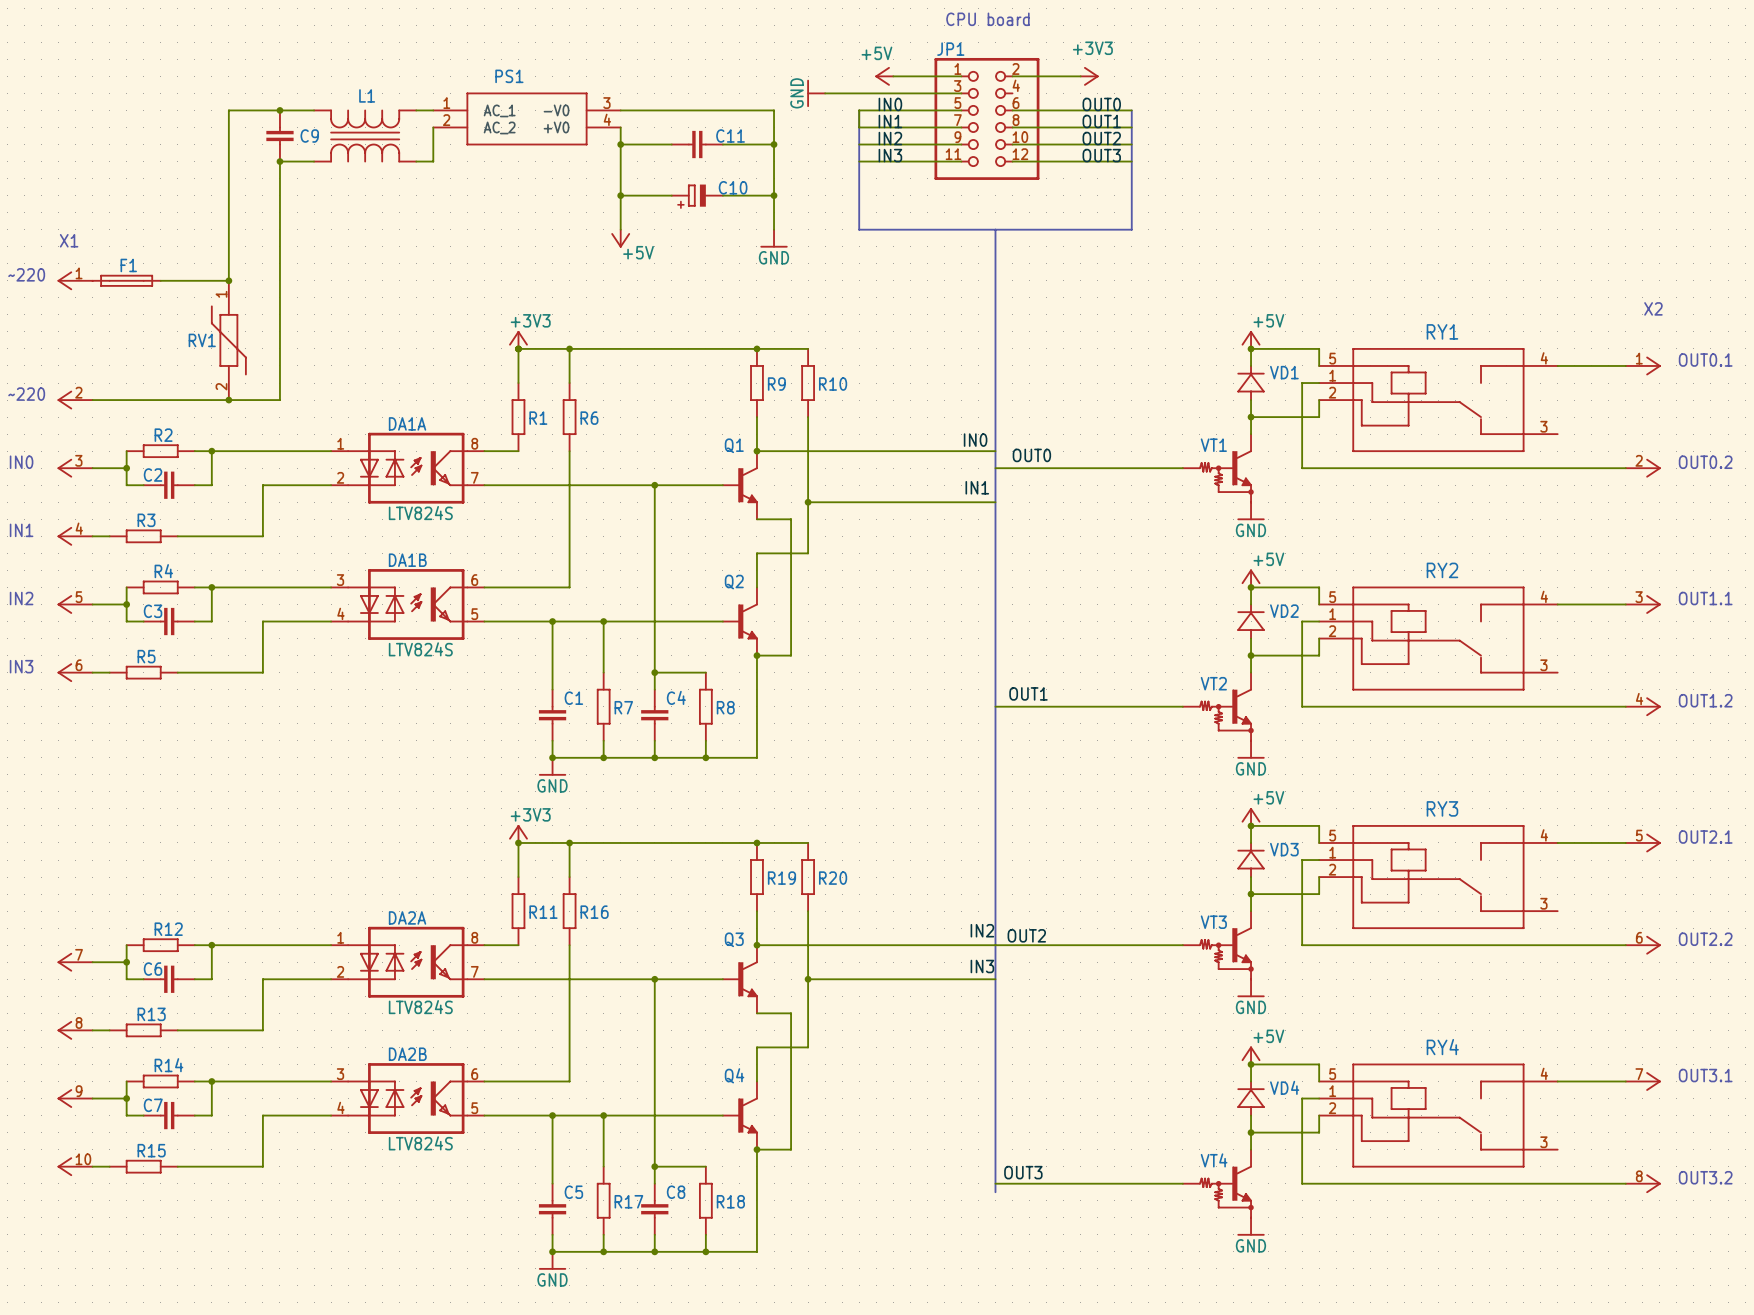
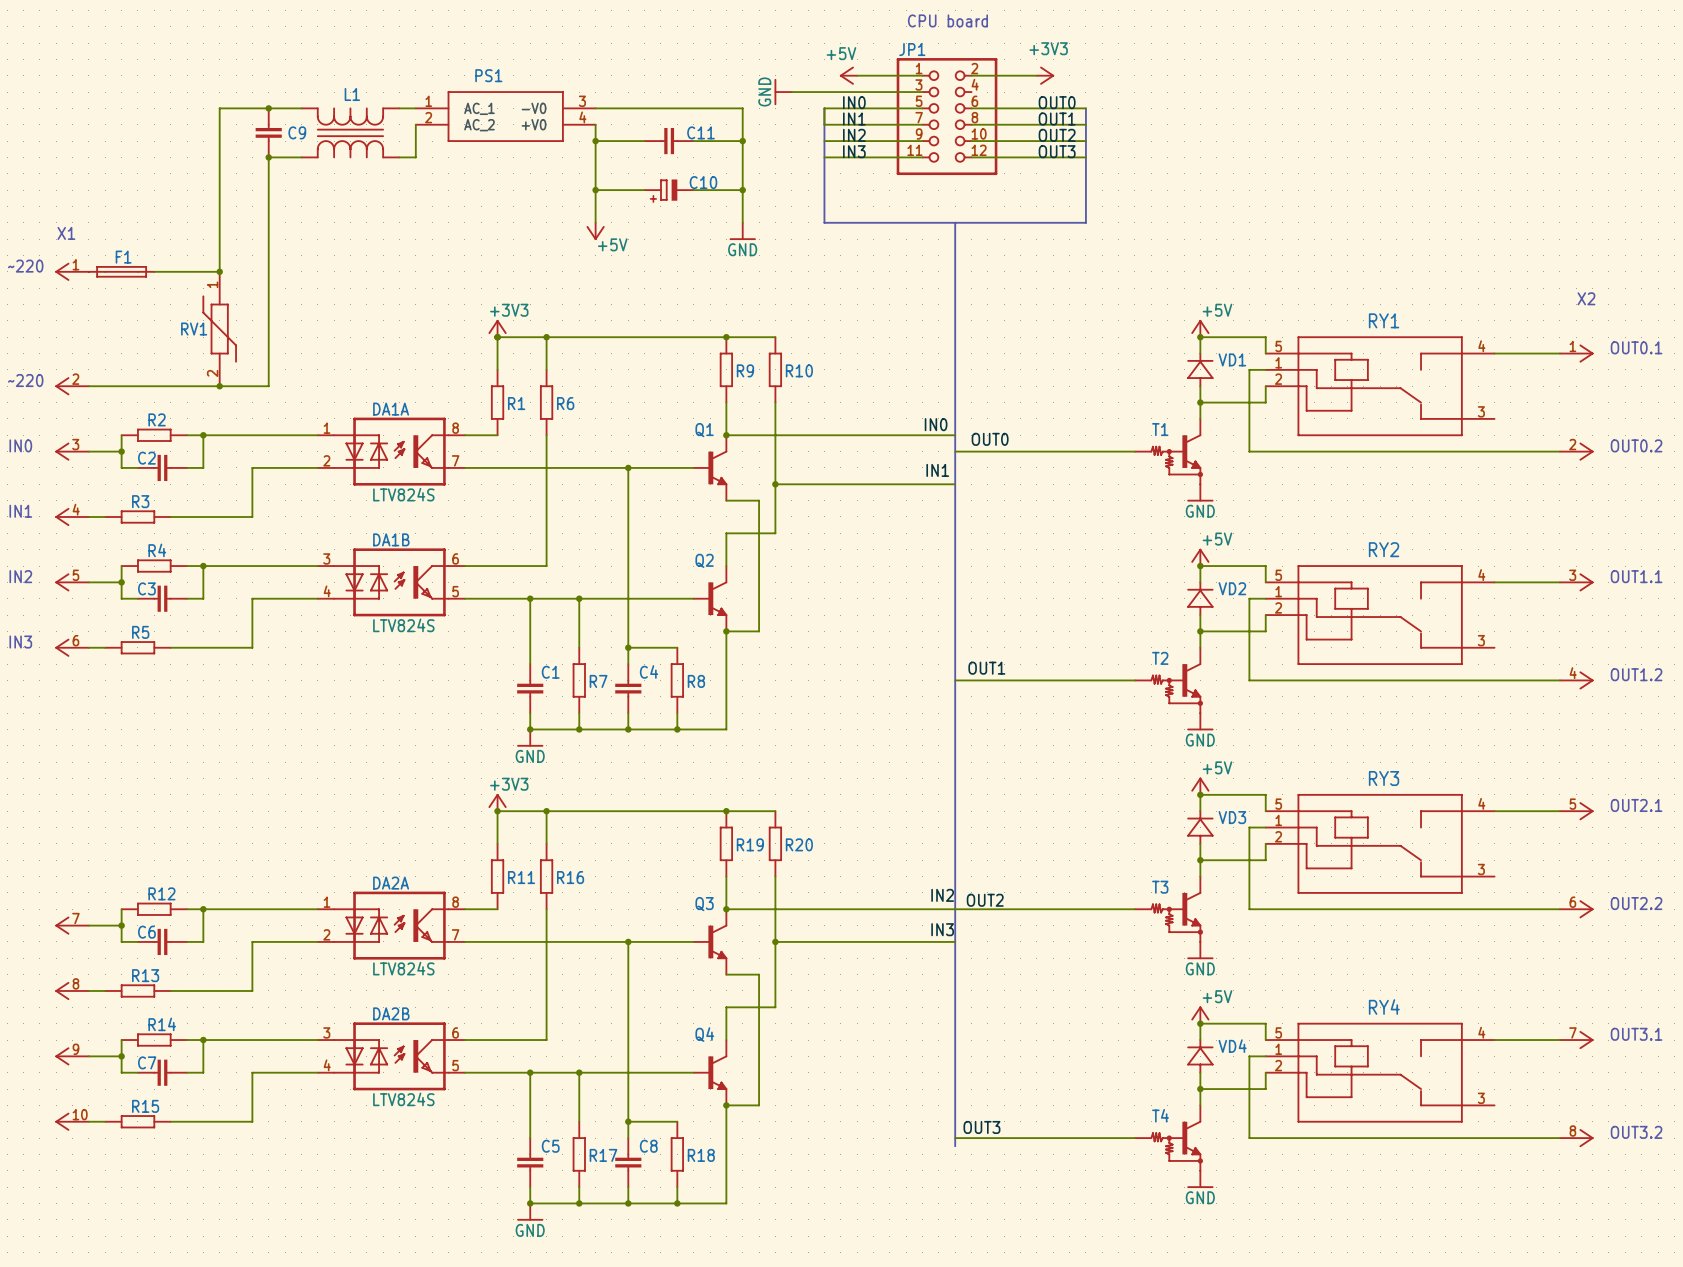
VT1 name: VT1 (1213, 445) -> T1 (1160, 429)
VT2 name: VT2 (1213, 683) -> T2 (1160, 658)
VT3 name: VT3 (1213, 922) -> T3 (1160, 887)
VT4 name: VT4 (1214, 1160) -> T4 (1160, 1115)

